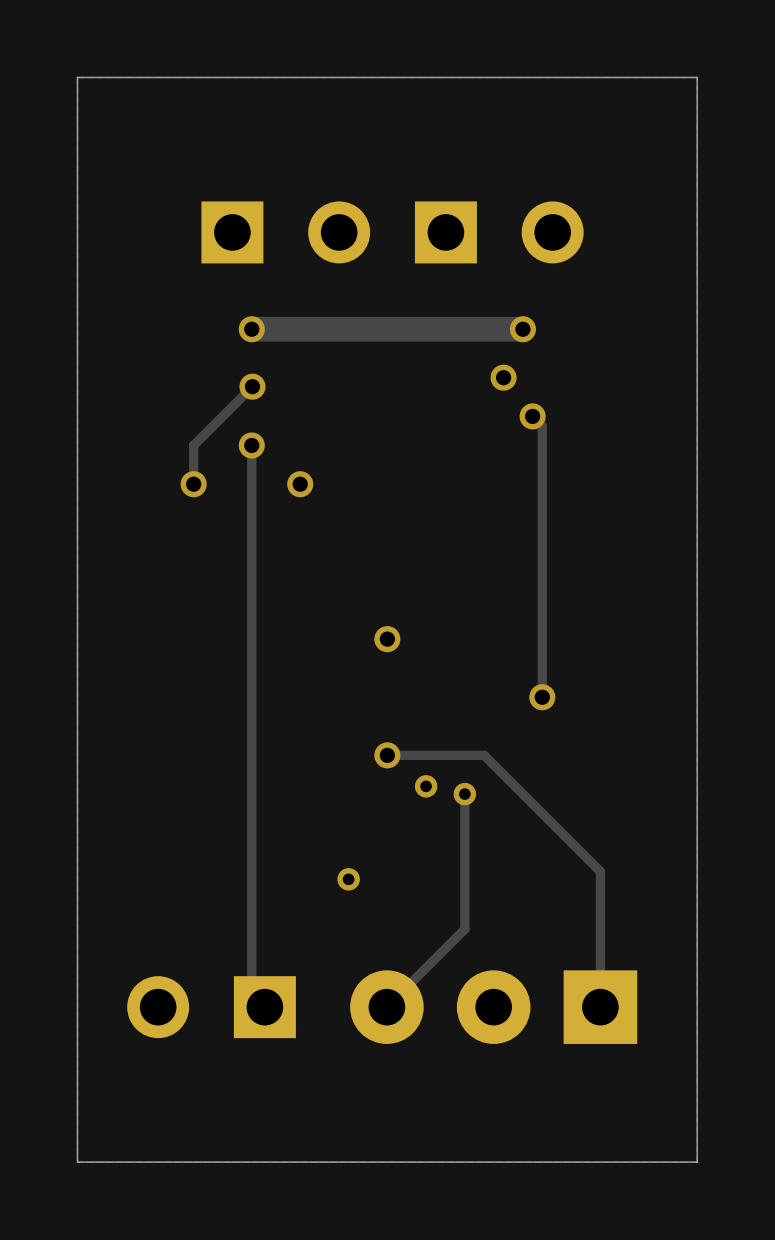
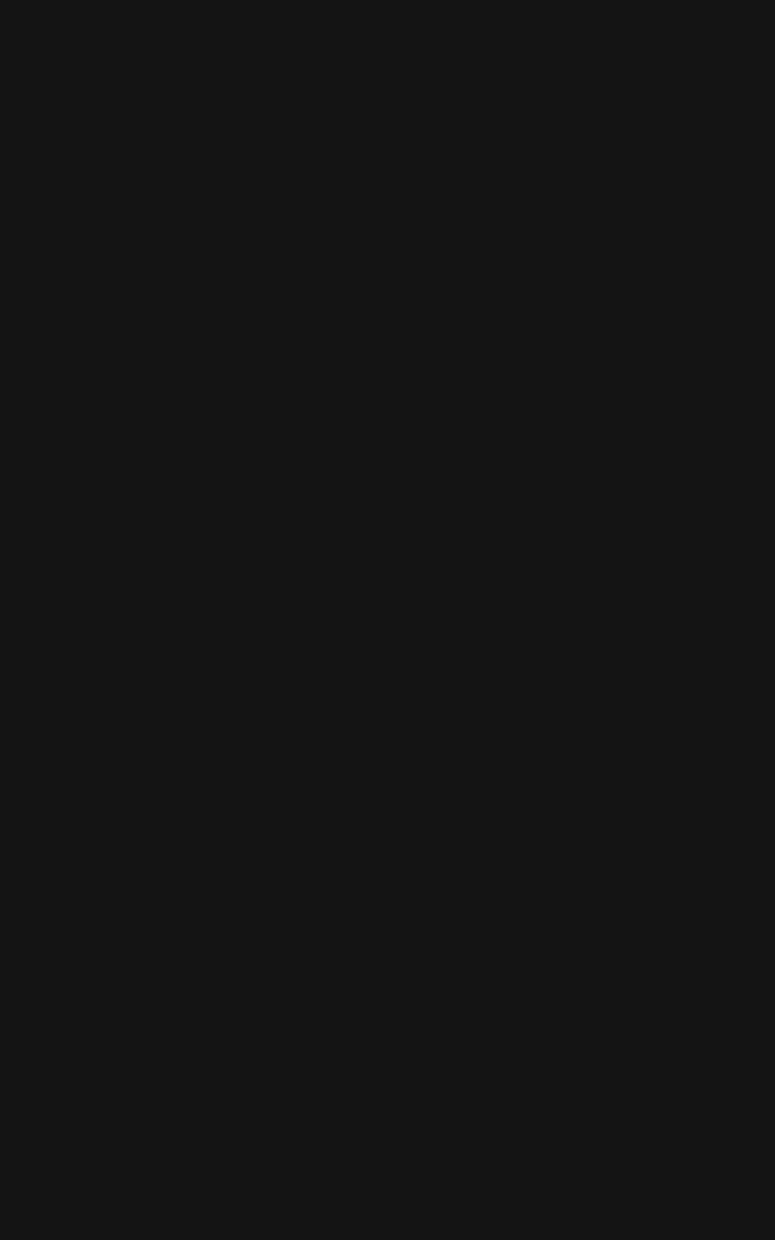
board edge: (697, 77) (77, 77) (77, 1162) (697, 1162) (697, 77) -> none
part: (285, 232) -> none
part: (499, 232) -> none
via: (251, 329) -> none
track: (522, 329) (251, 329) -> none
via: (522, 329) -> none
via: (503, 377) -> none
track: (252, 386) (193, 445) (193, 484) -> none
via: (252, 386) -> none
track: (532, 416) (542, 426) (542, 697) -> none
via: (532, 416) -> none
track: (251, 445) (251, 994) (264, 1007) -> none
via: (251, 445) -> none
via: (193, 484) -> none
via: (300, 484) -> none
via: (387, 639) -> none
via: (542, 697) -> none
track: (387, 755) (484, 755) (600, 871) (600, 1007) -> none
via: (387, 755) -> none
via: (426, 786) -> none
track: (464, 794) (464, 929) (386, 1007) -> none
via: (464, 794) -> none
via: (348, 879) -> none
part: (211, 1007) -> none
part: (493, 1007) -> none

